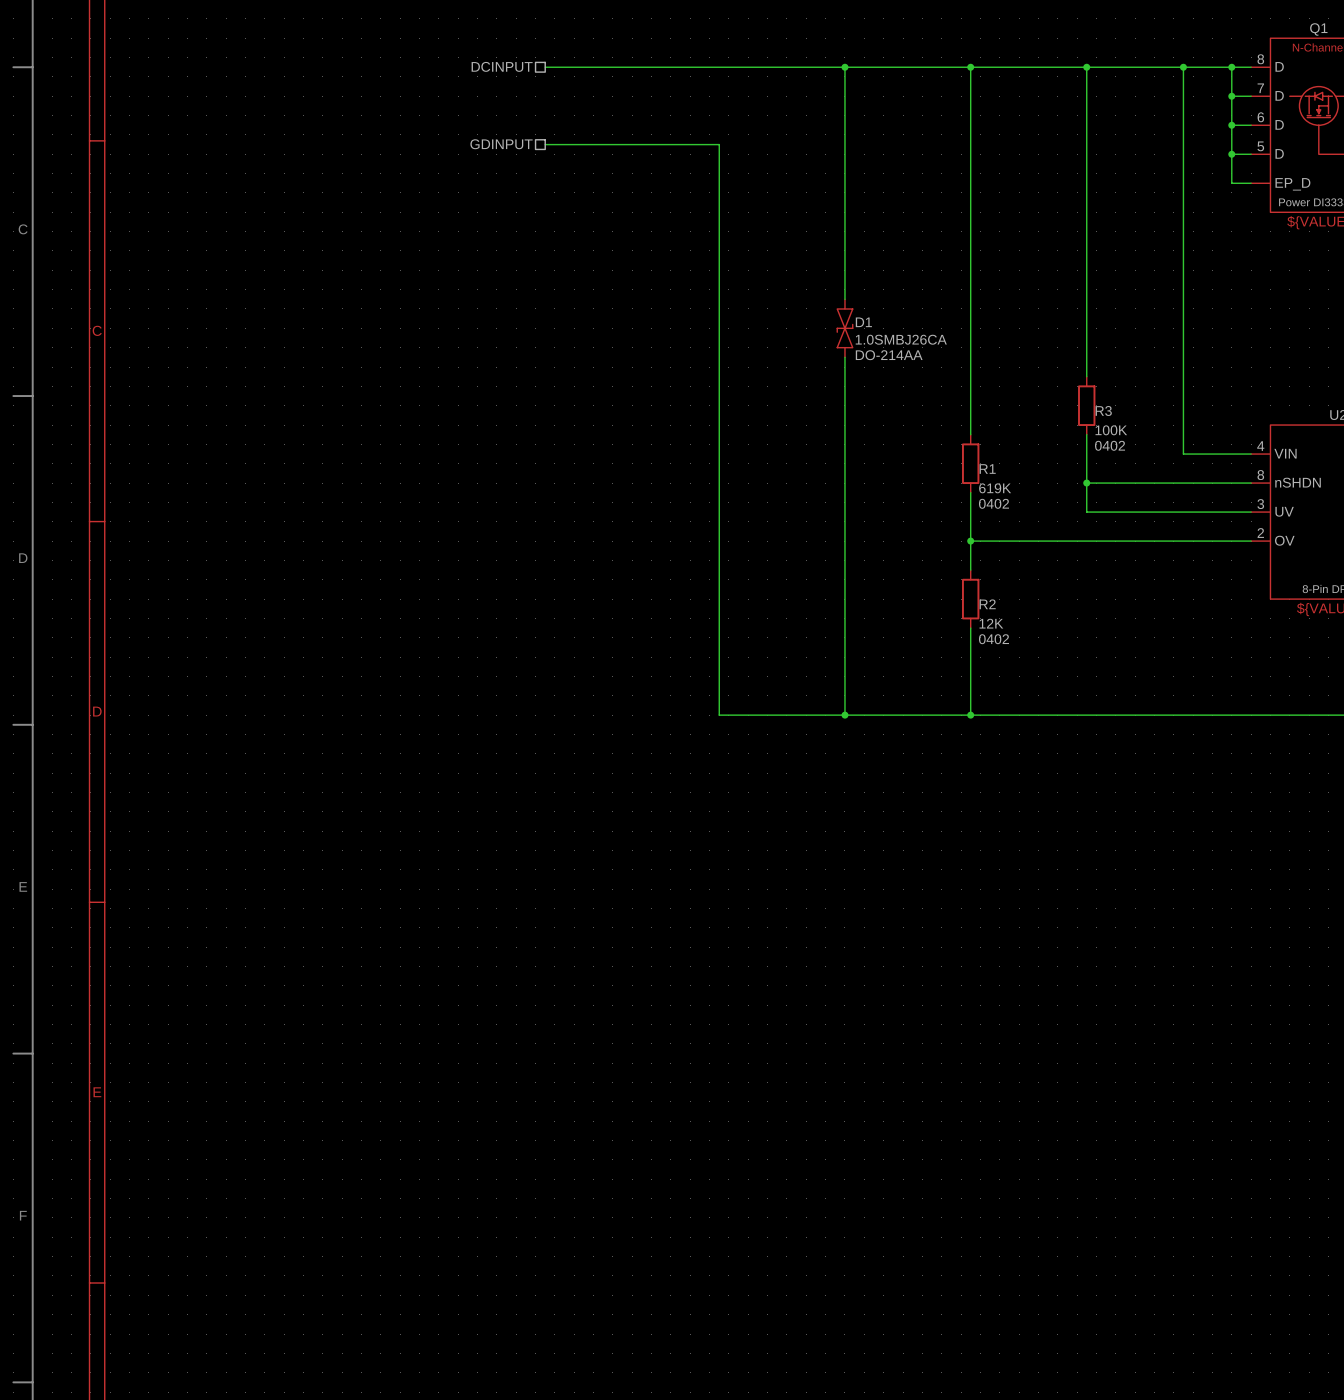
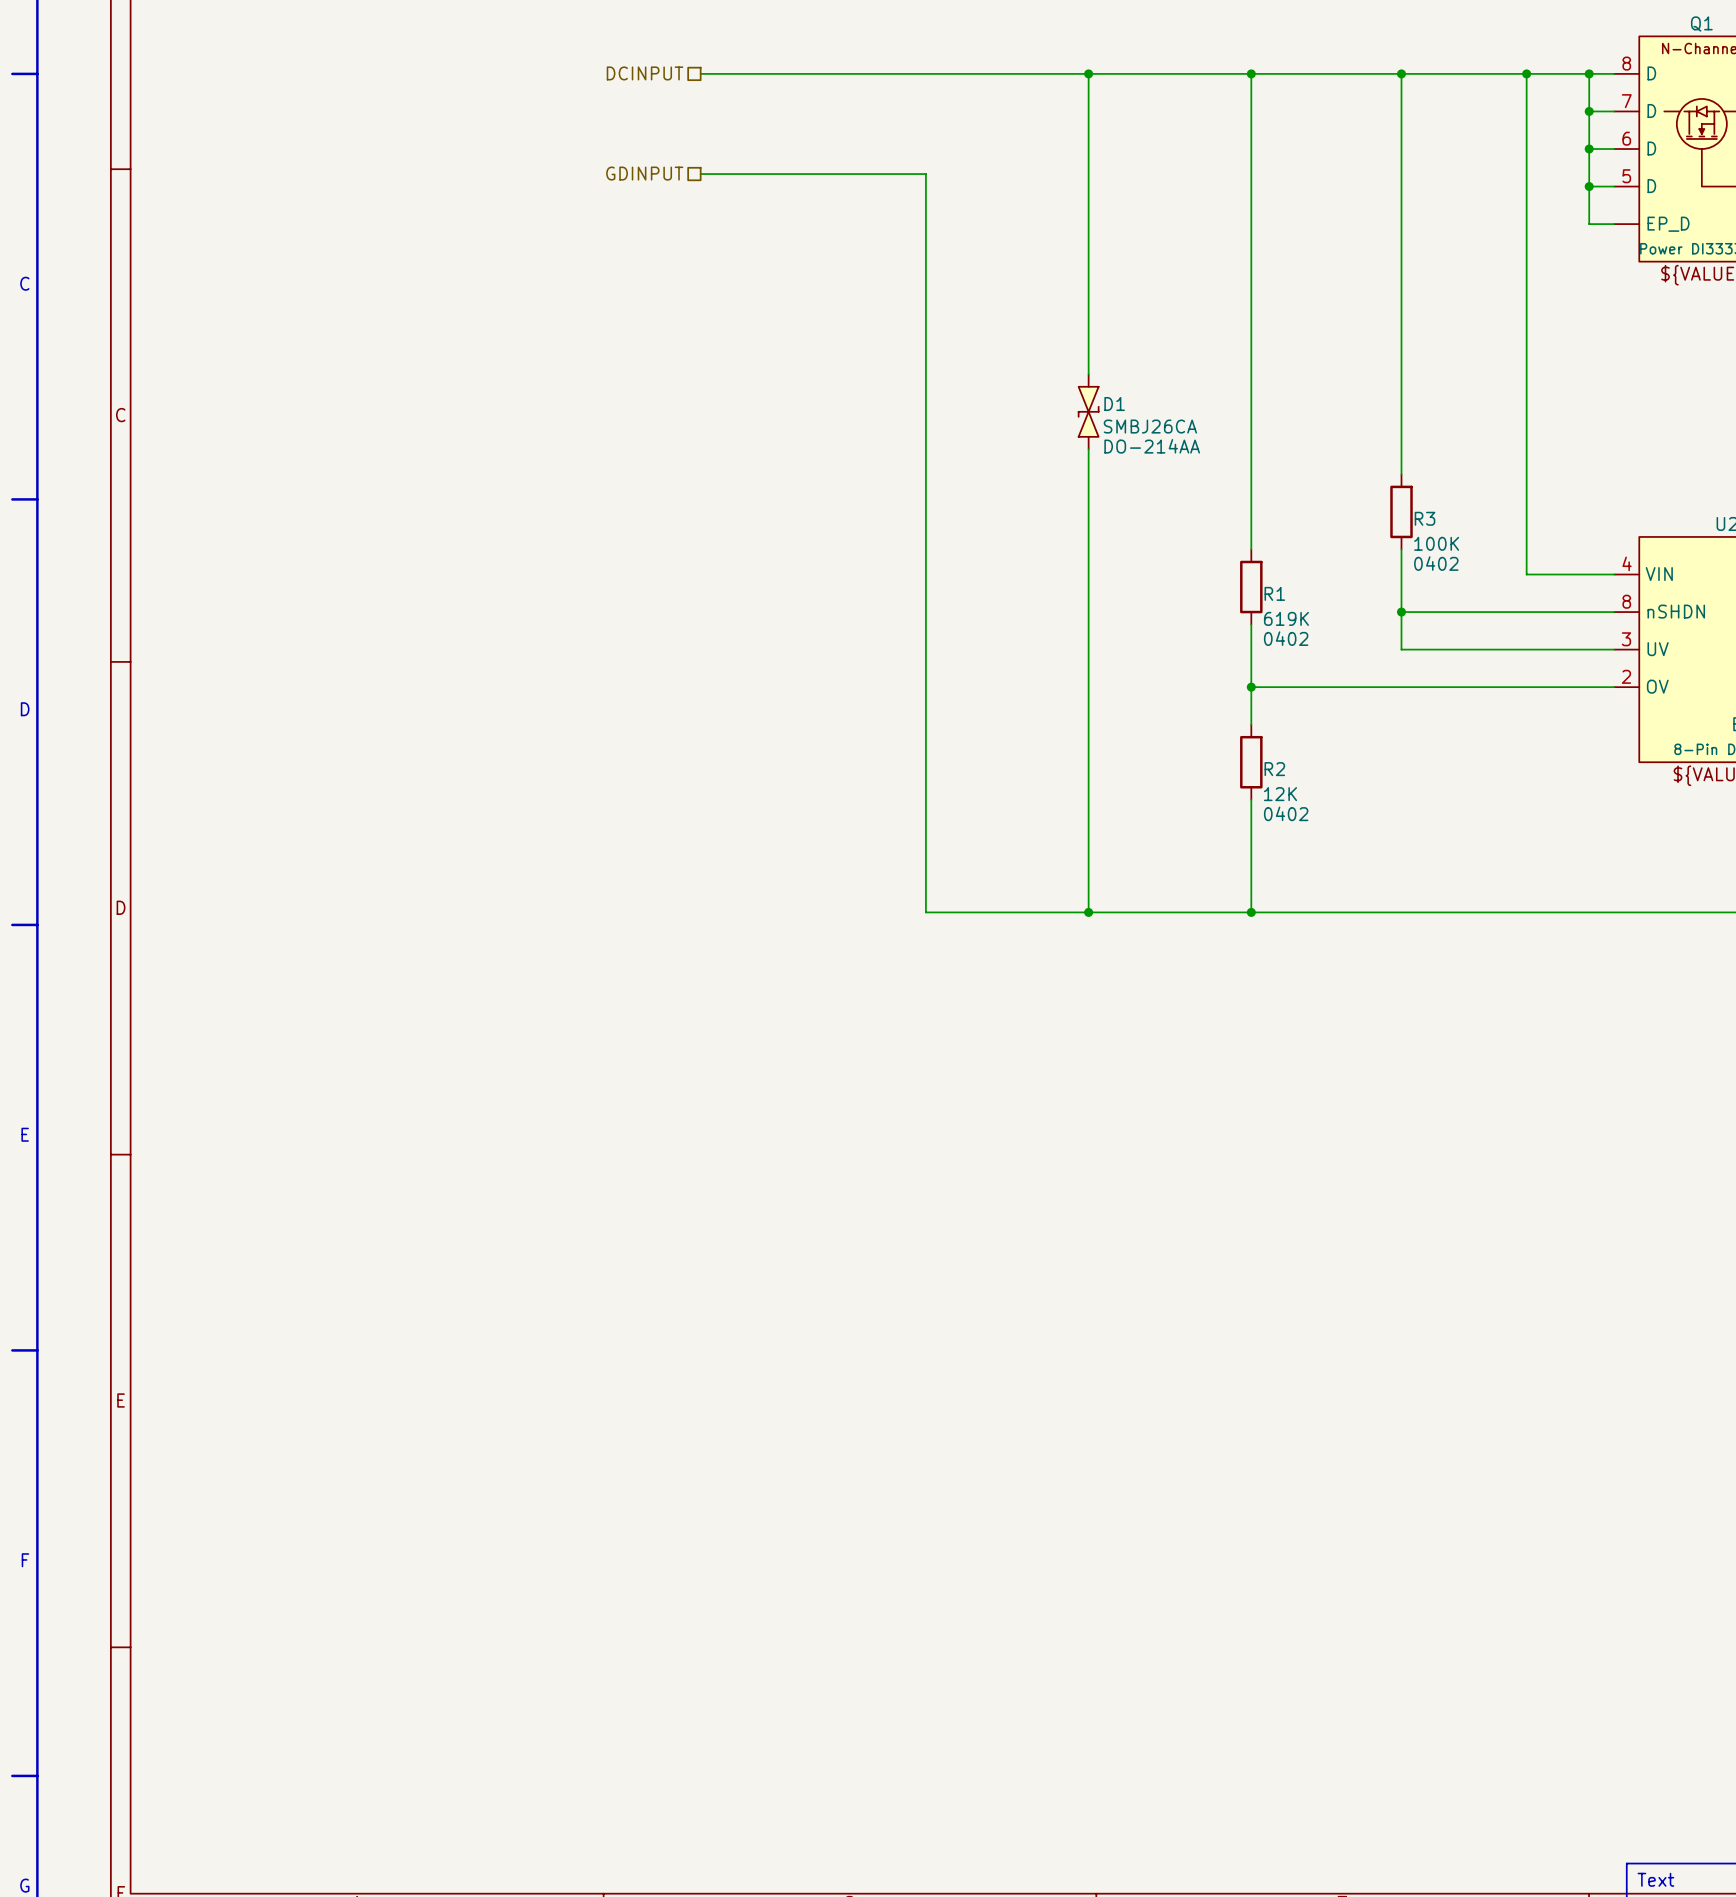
D1 text: 1.0SMBJ26CA (901, 339) -> SMBJ26CA (1150, 426)

